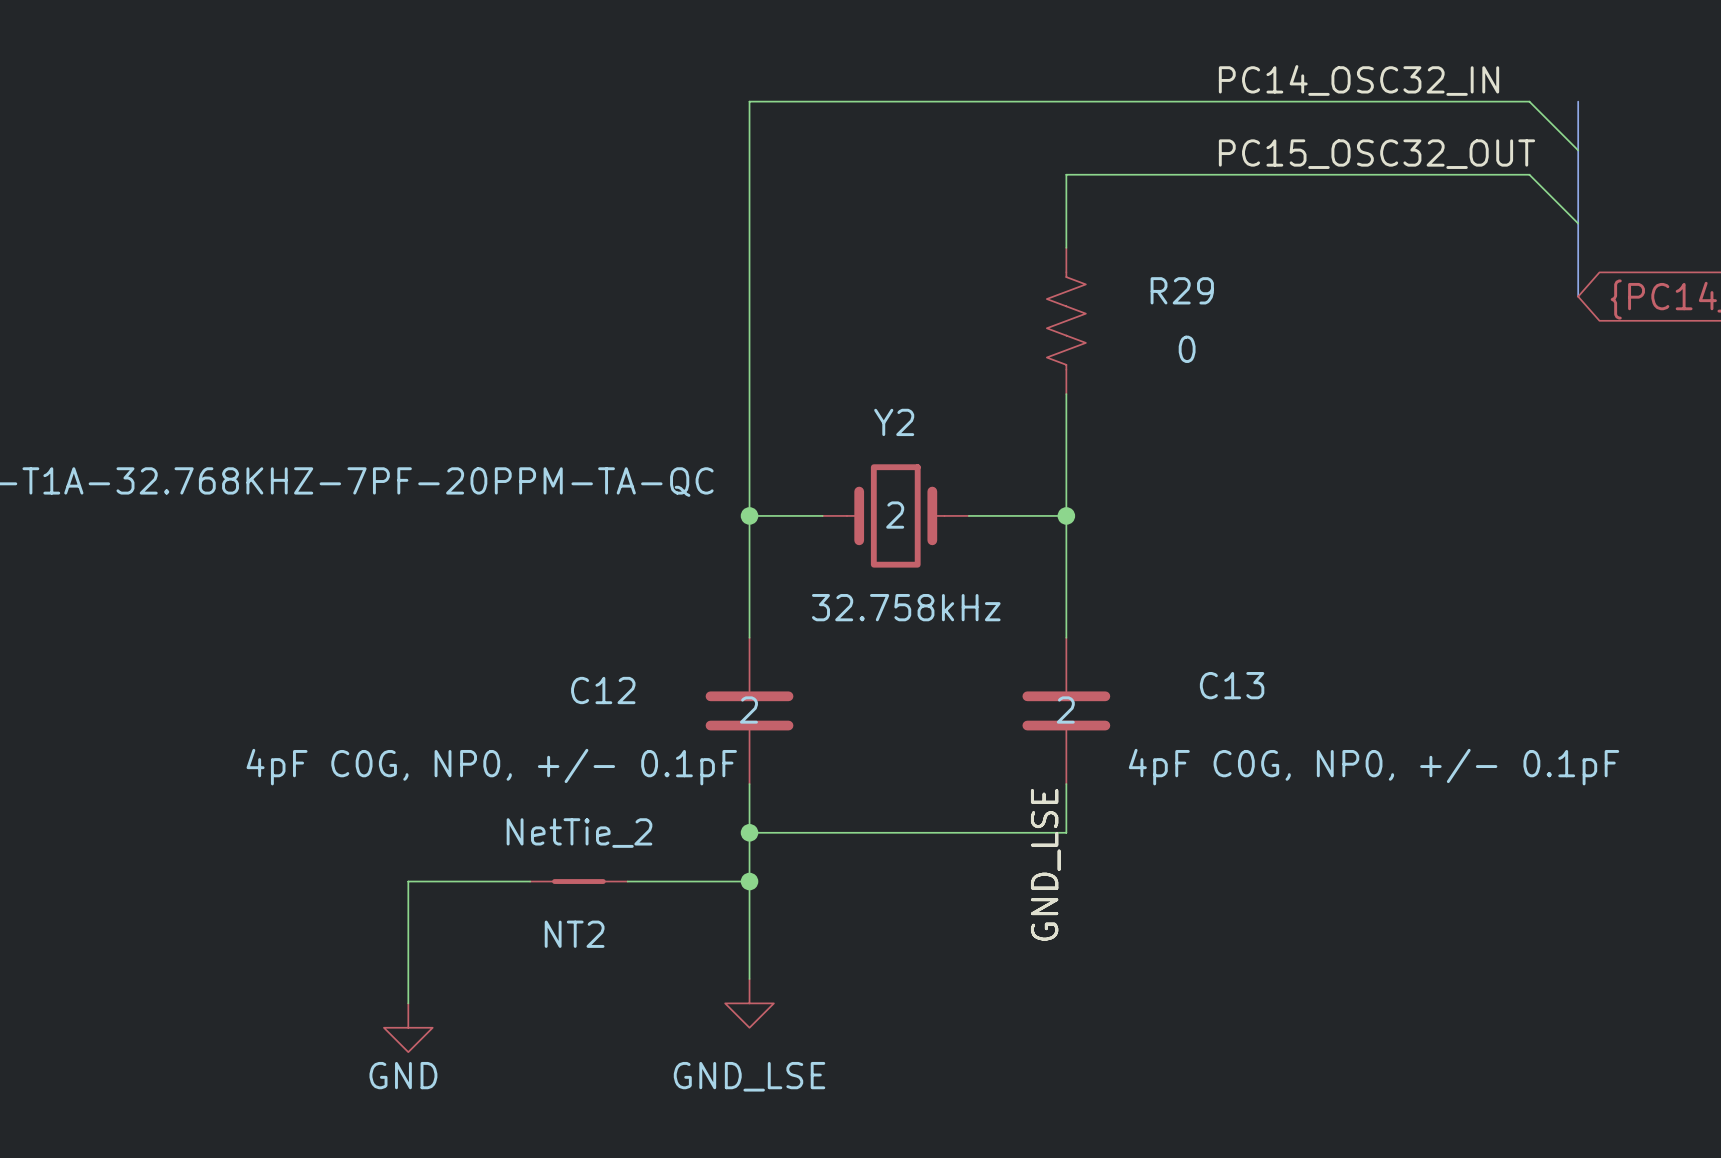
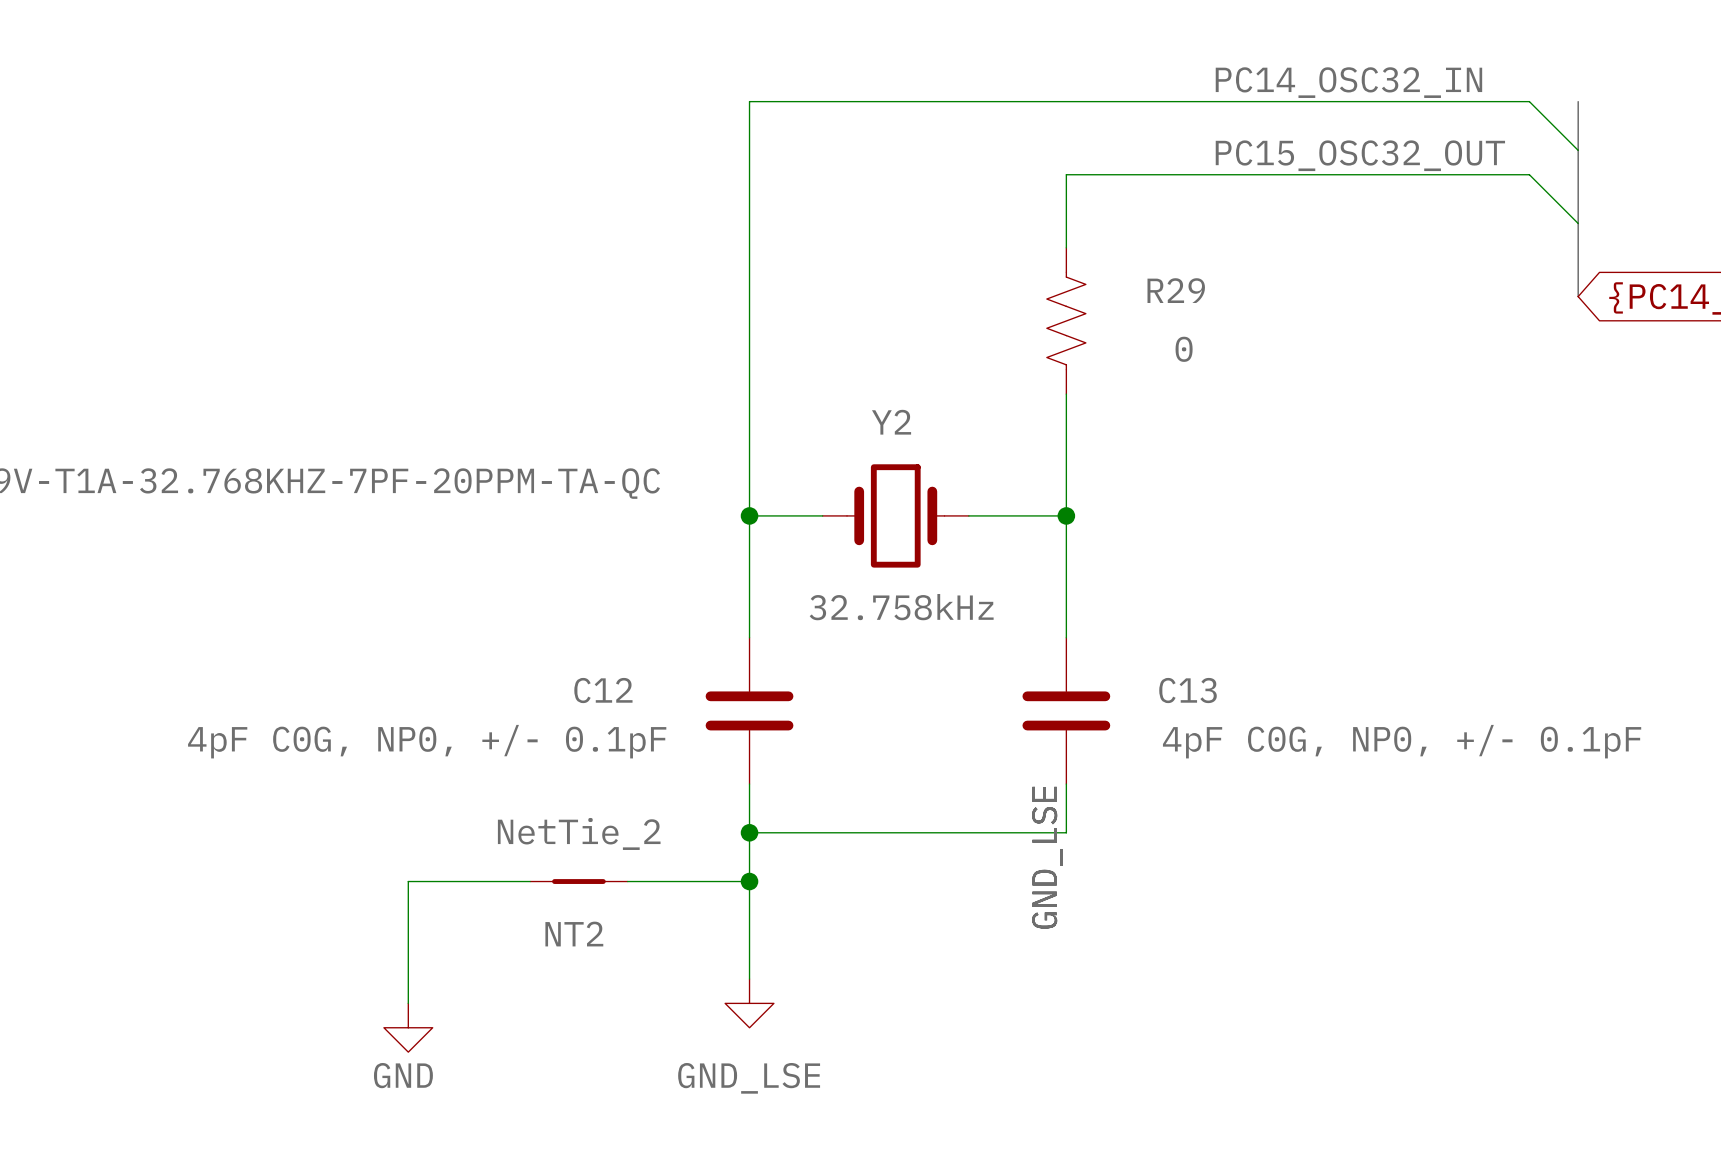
Y2 text: 2 (895, 515) -> none
C13 name position: C13 (1232, 685) -> C13 (1188, 690)
C12 text: 2 (748, 710) -> none
C13 text: 2 (1065, 710) -> none
C12 value position: 4pF C0G, NP0, +/- 0.1pF (491, 767) -> 4pF C0G, NP0, +/- 0.1pF (427, 741)
C13 value position: 4pF C0G, NP0, +/- 0.1pF (1374, 767) -> 4pF C0G, NP0, +/- 0.1pF (1402, 741)

